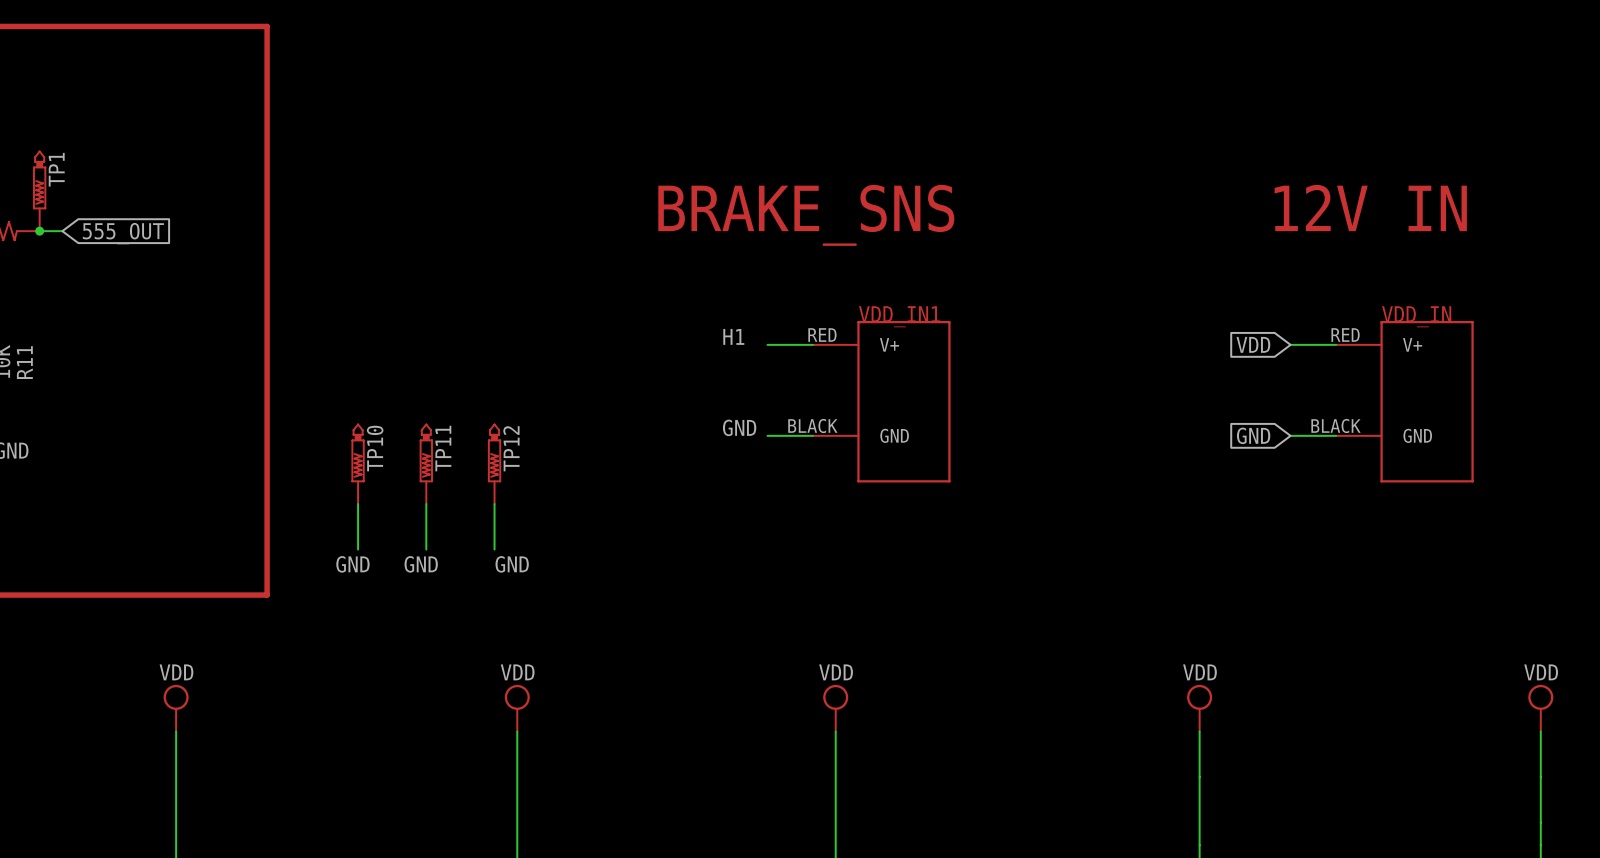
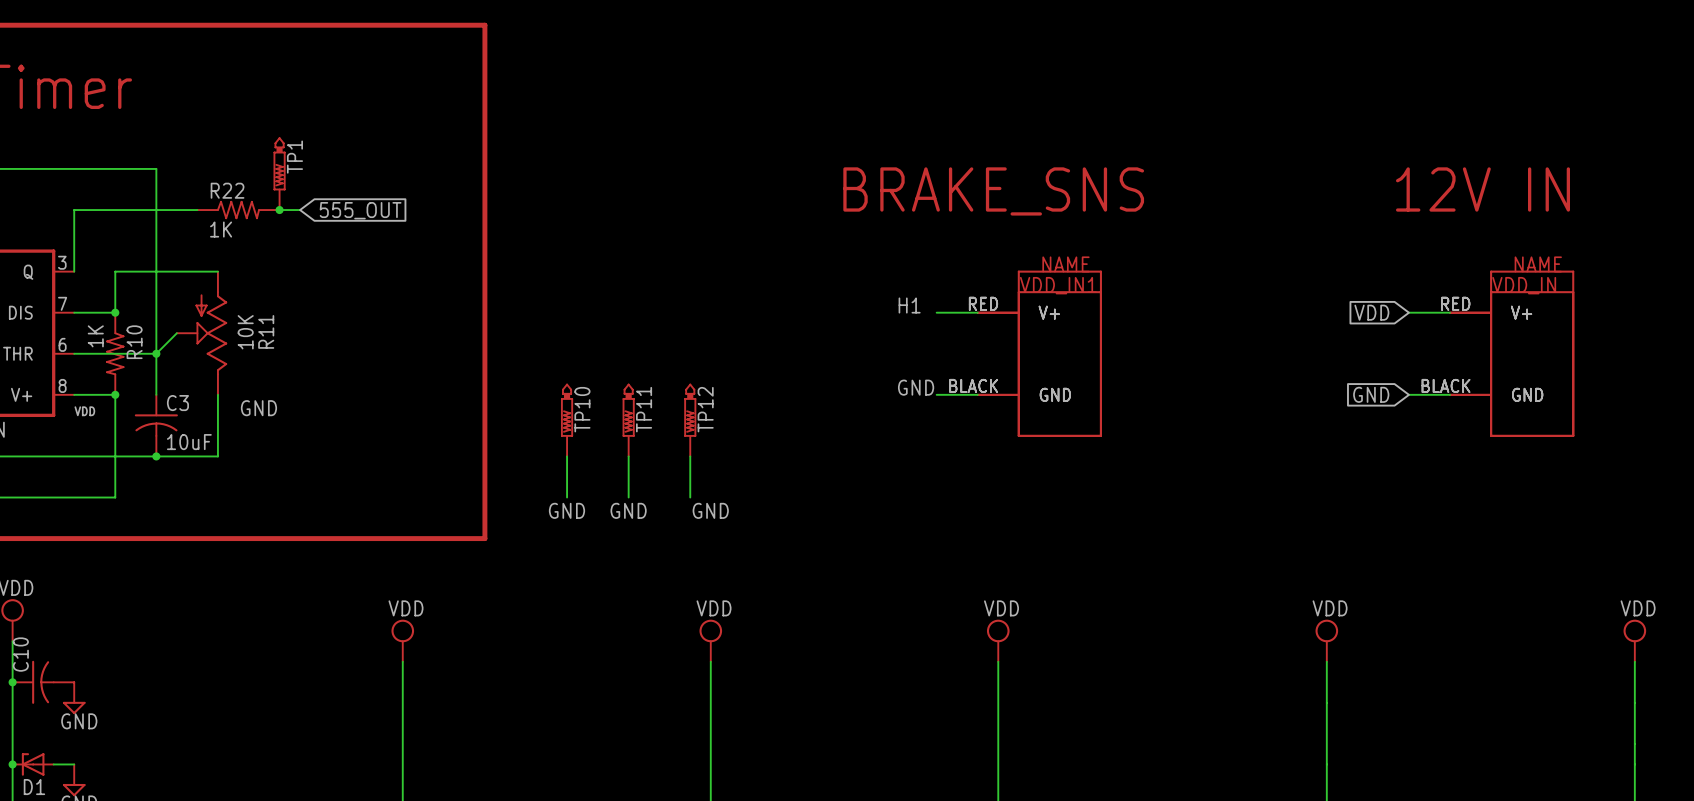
part: none -> (1039, 353)
part: none -> (1512, 353)

